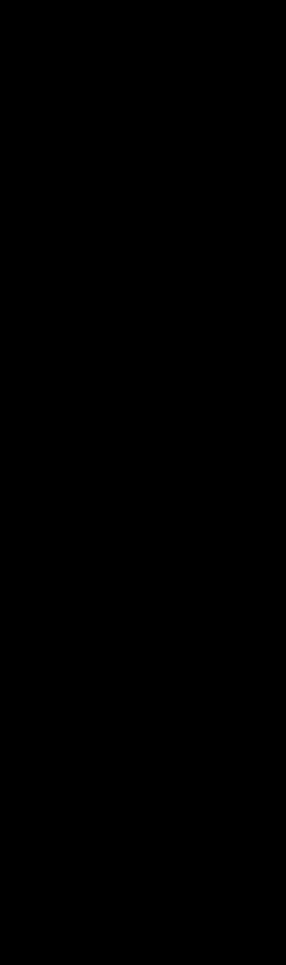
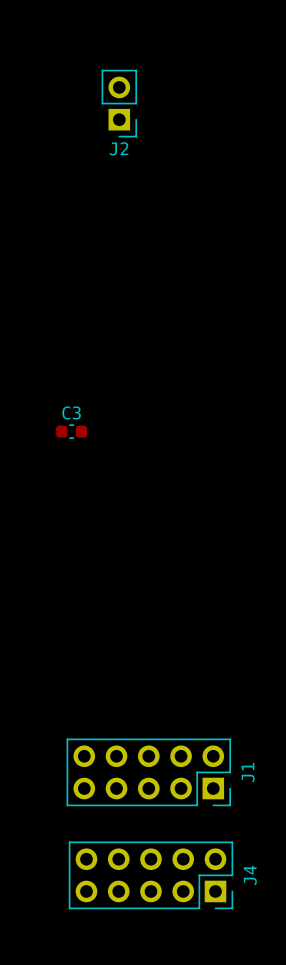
J2: none -> (119, 103)
C3: none -> (71, 431)
J1: none -> (148, 772)
J4: none -> (150, 875)

